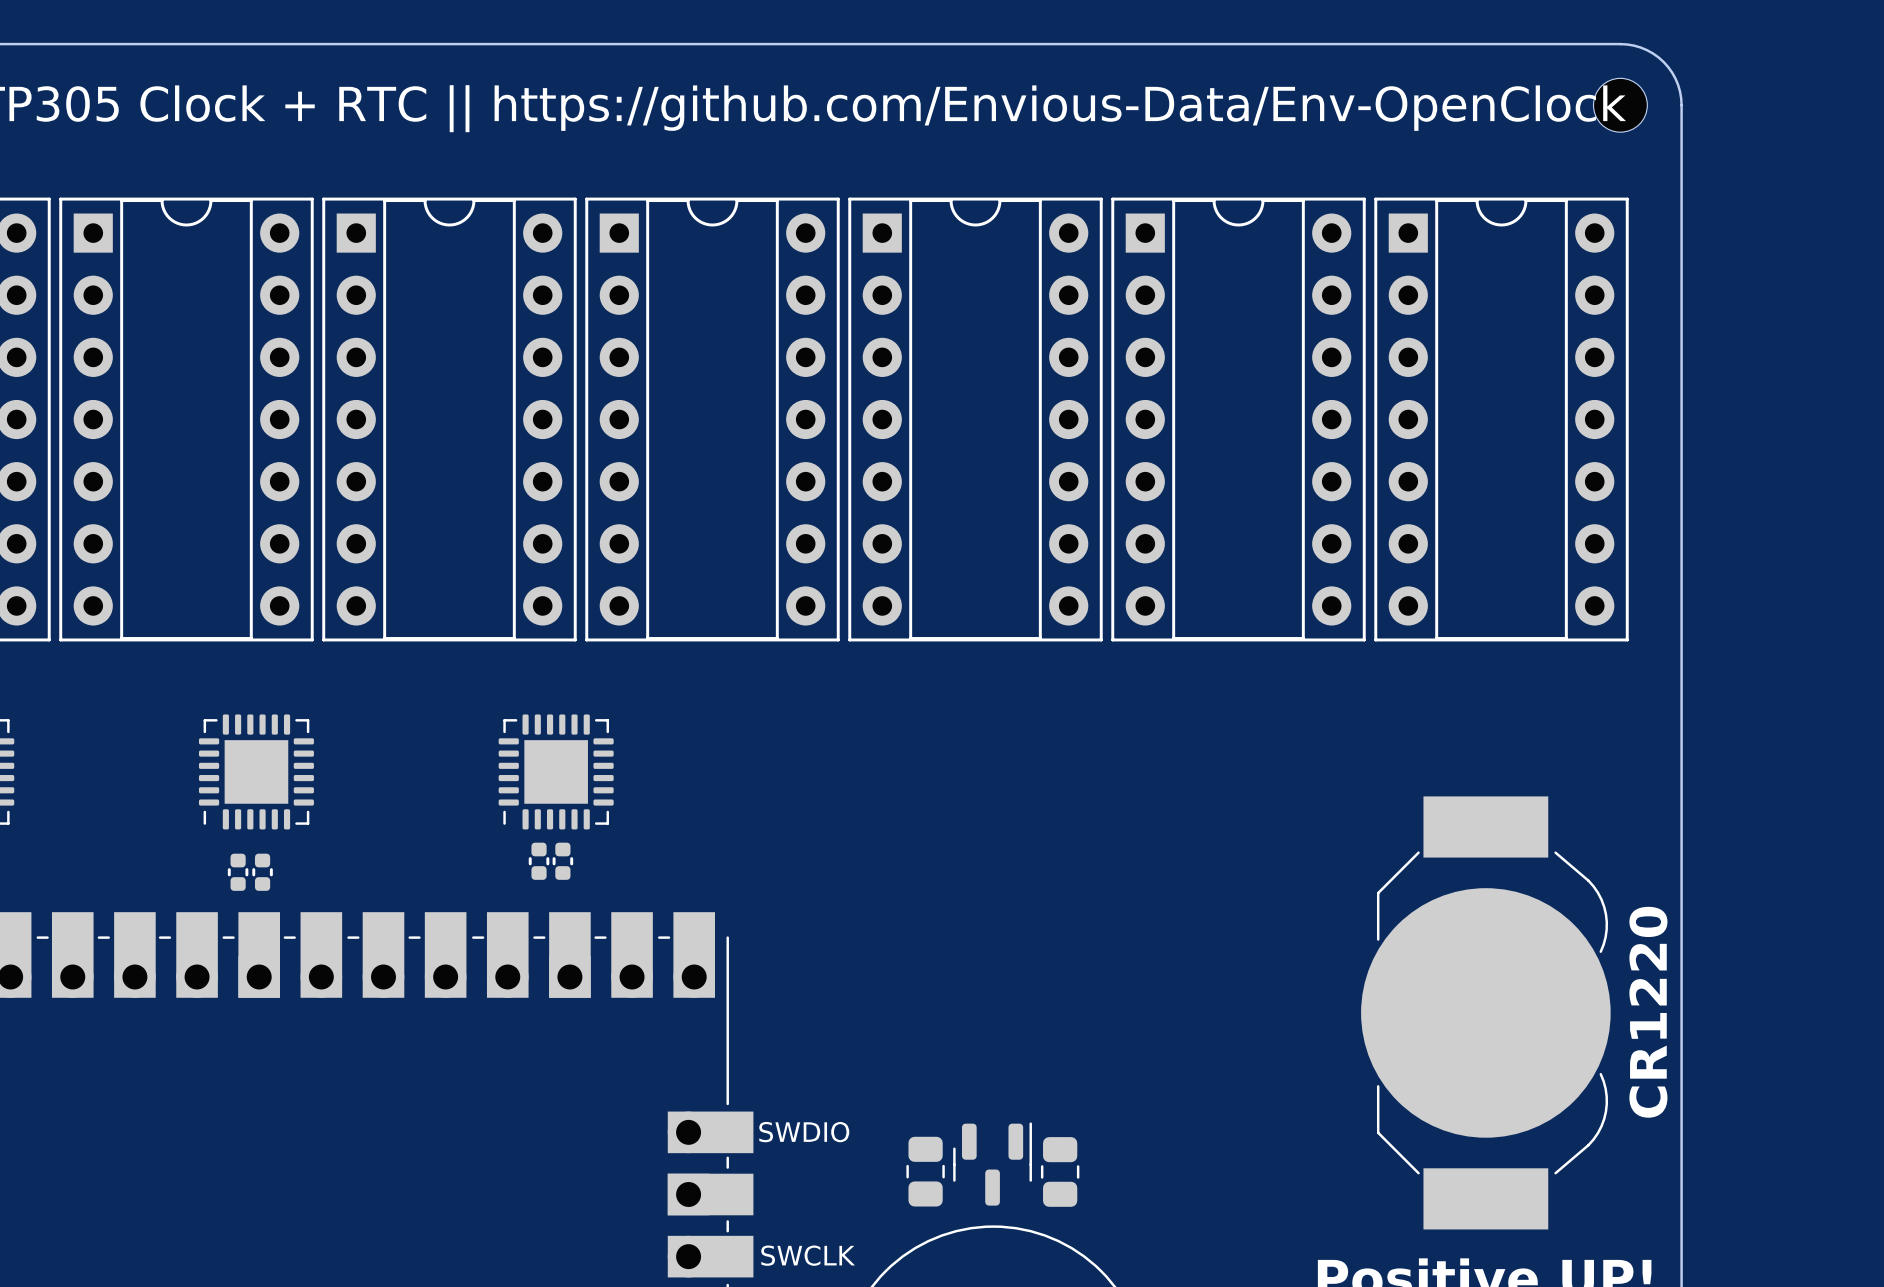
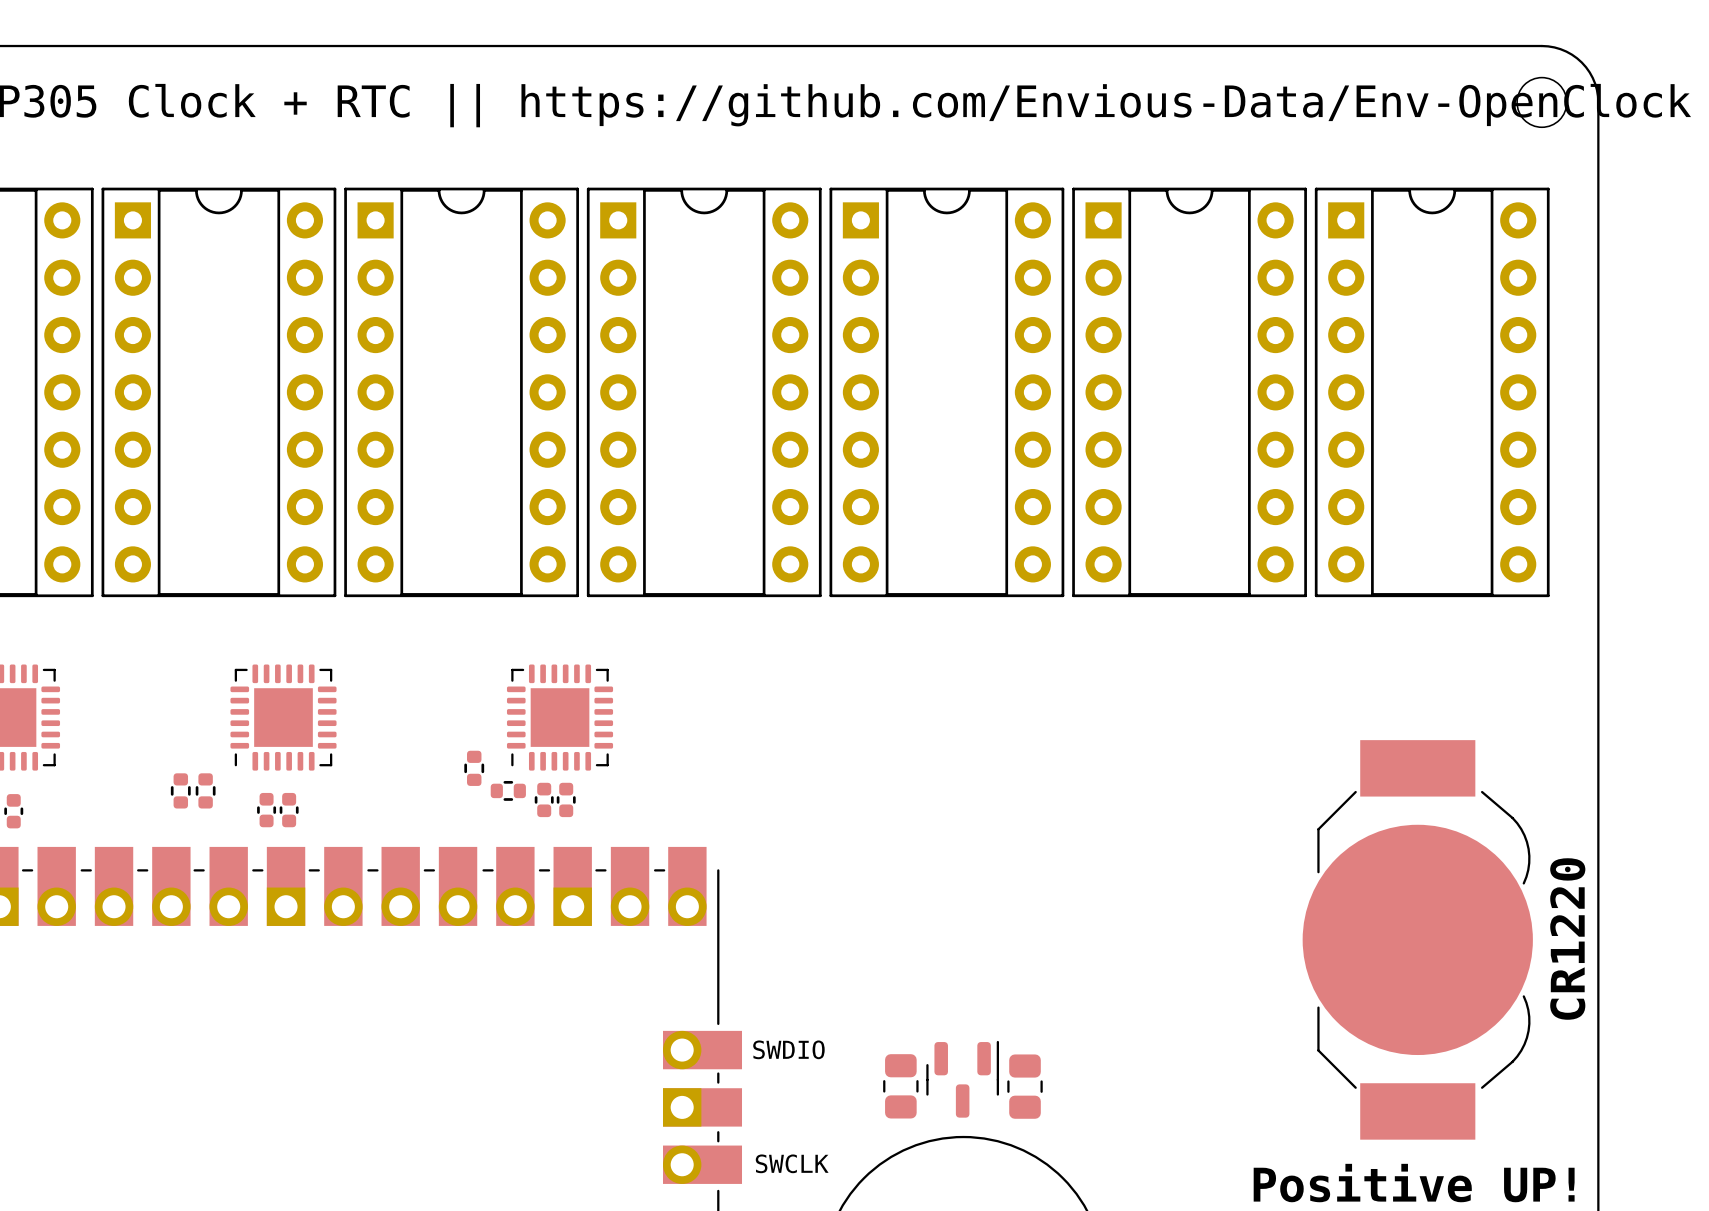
part: none -> (474, 768)
part: none -> (180, 790)
part: none -> (205, 790)
part: none -> (508, 790)

